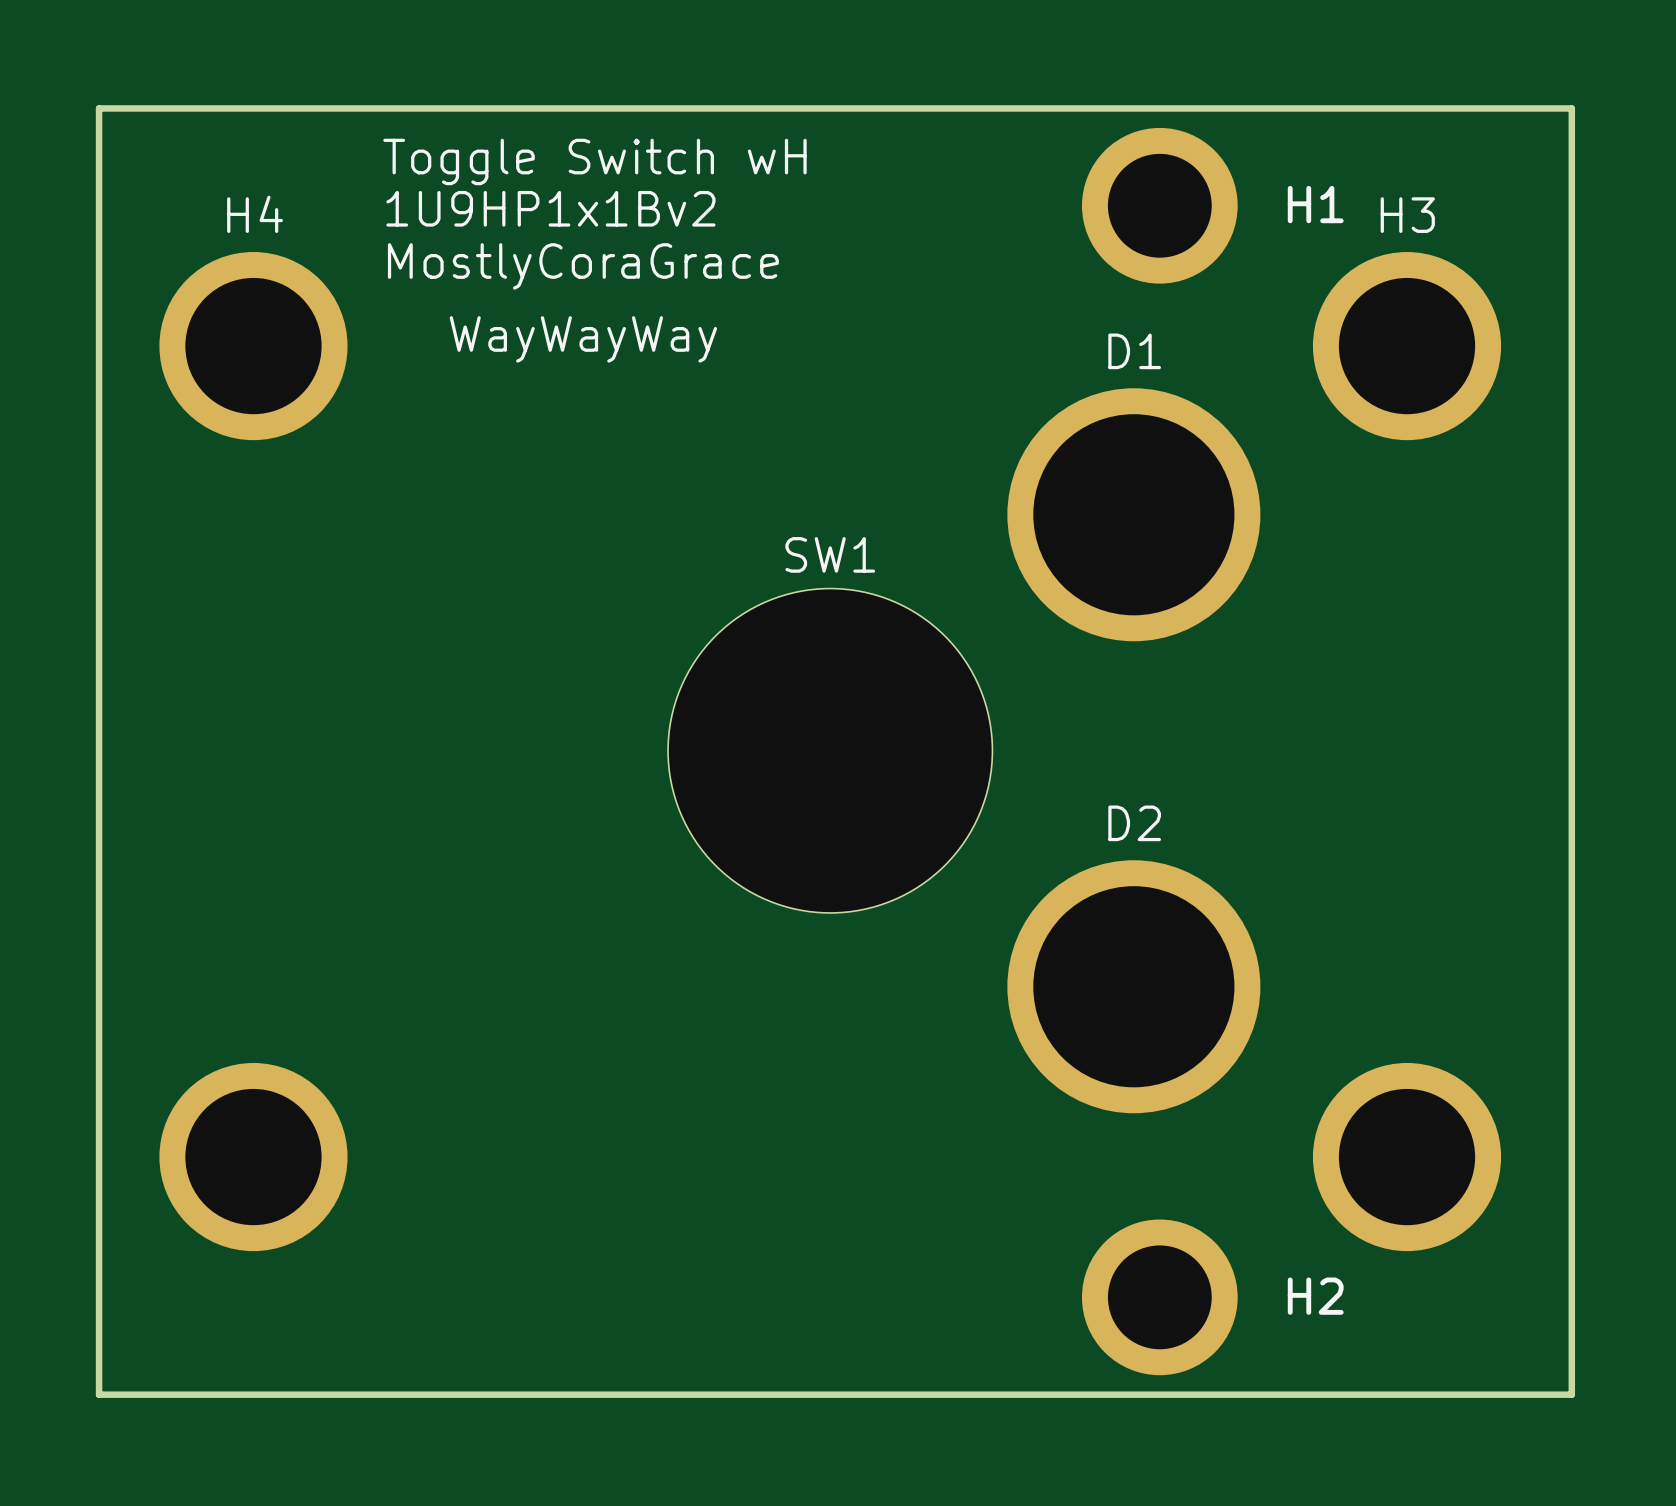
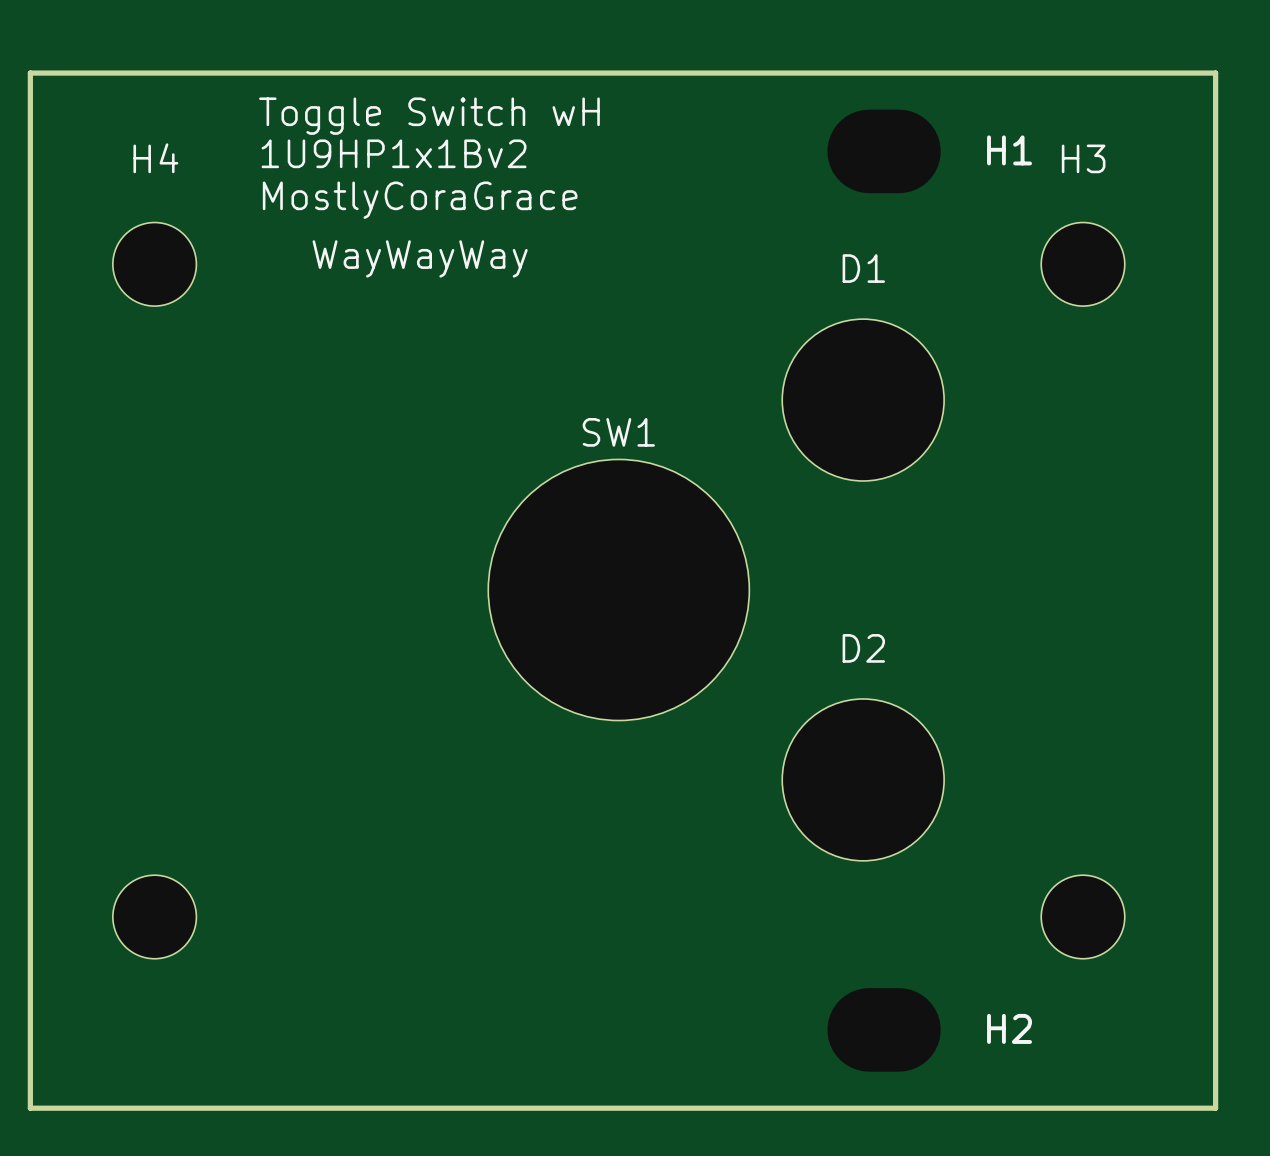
H1 footprint: [1081, 127, 1238, 284] -> [827, 109, 941, 194]
H4 footprint: [159, 252, 348, 1252] -> [112, 222, 197, 959]
H3 footprint: [1312, 252, 1502, 1252] -> [1041, 222, 1125, 959]
D1 footprint: [1007, 388, 1261, 642] -> [782, 319, 945, 481]
D2 footprint: [1007, 860, 1261, 1114] -> [782, 698, 945, 861]
H2 footprint: [1081, 1219, 1238, 1376] -> [827, 988, 941, 1072]

